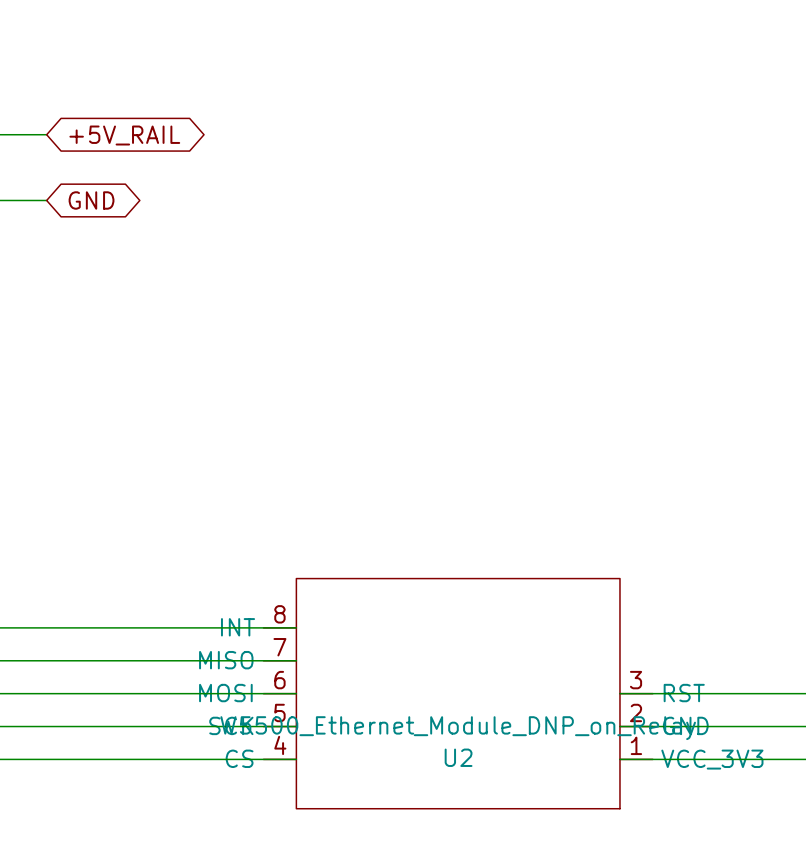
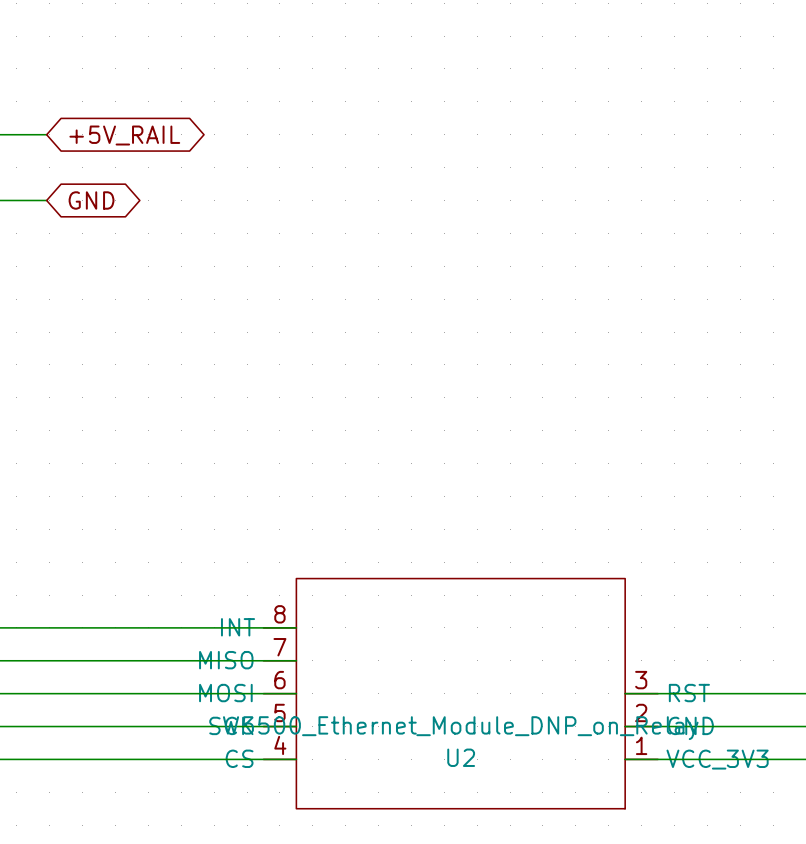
U2 symbol: [263, 578, 653, 809] -> [263, 578, 659, 809]
wire: (619, 693) (625, 693) -> none
wire: (619, 726) (625, 726) -> none
wire: (619, 759) (625, 759) -> none

